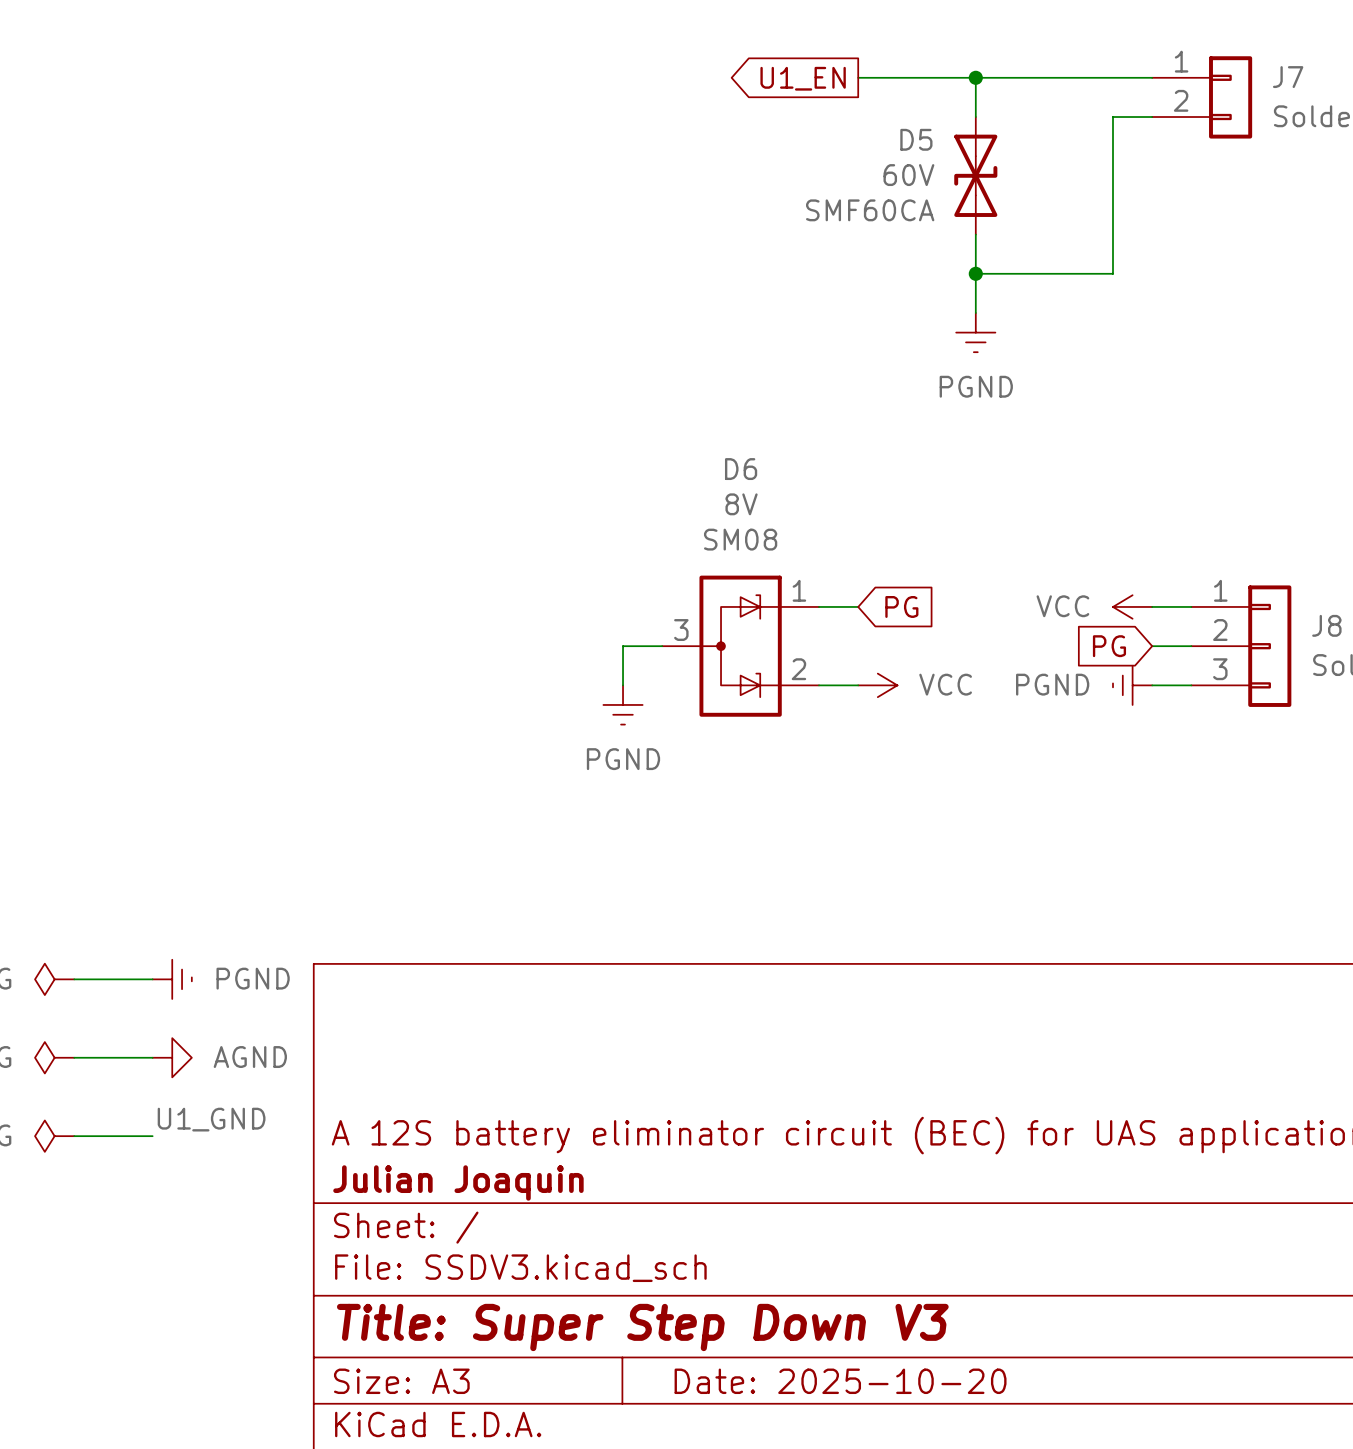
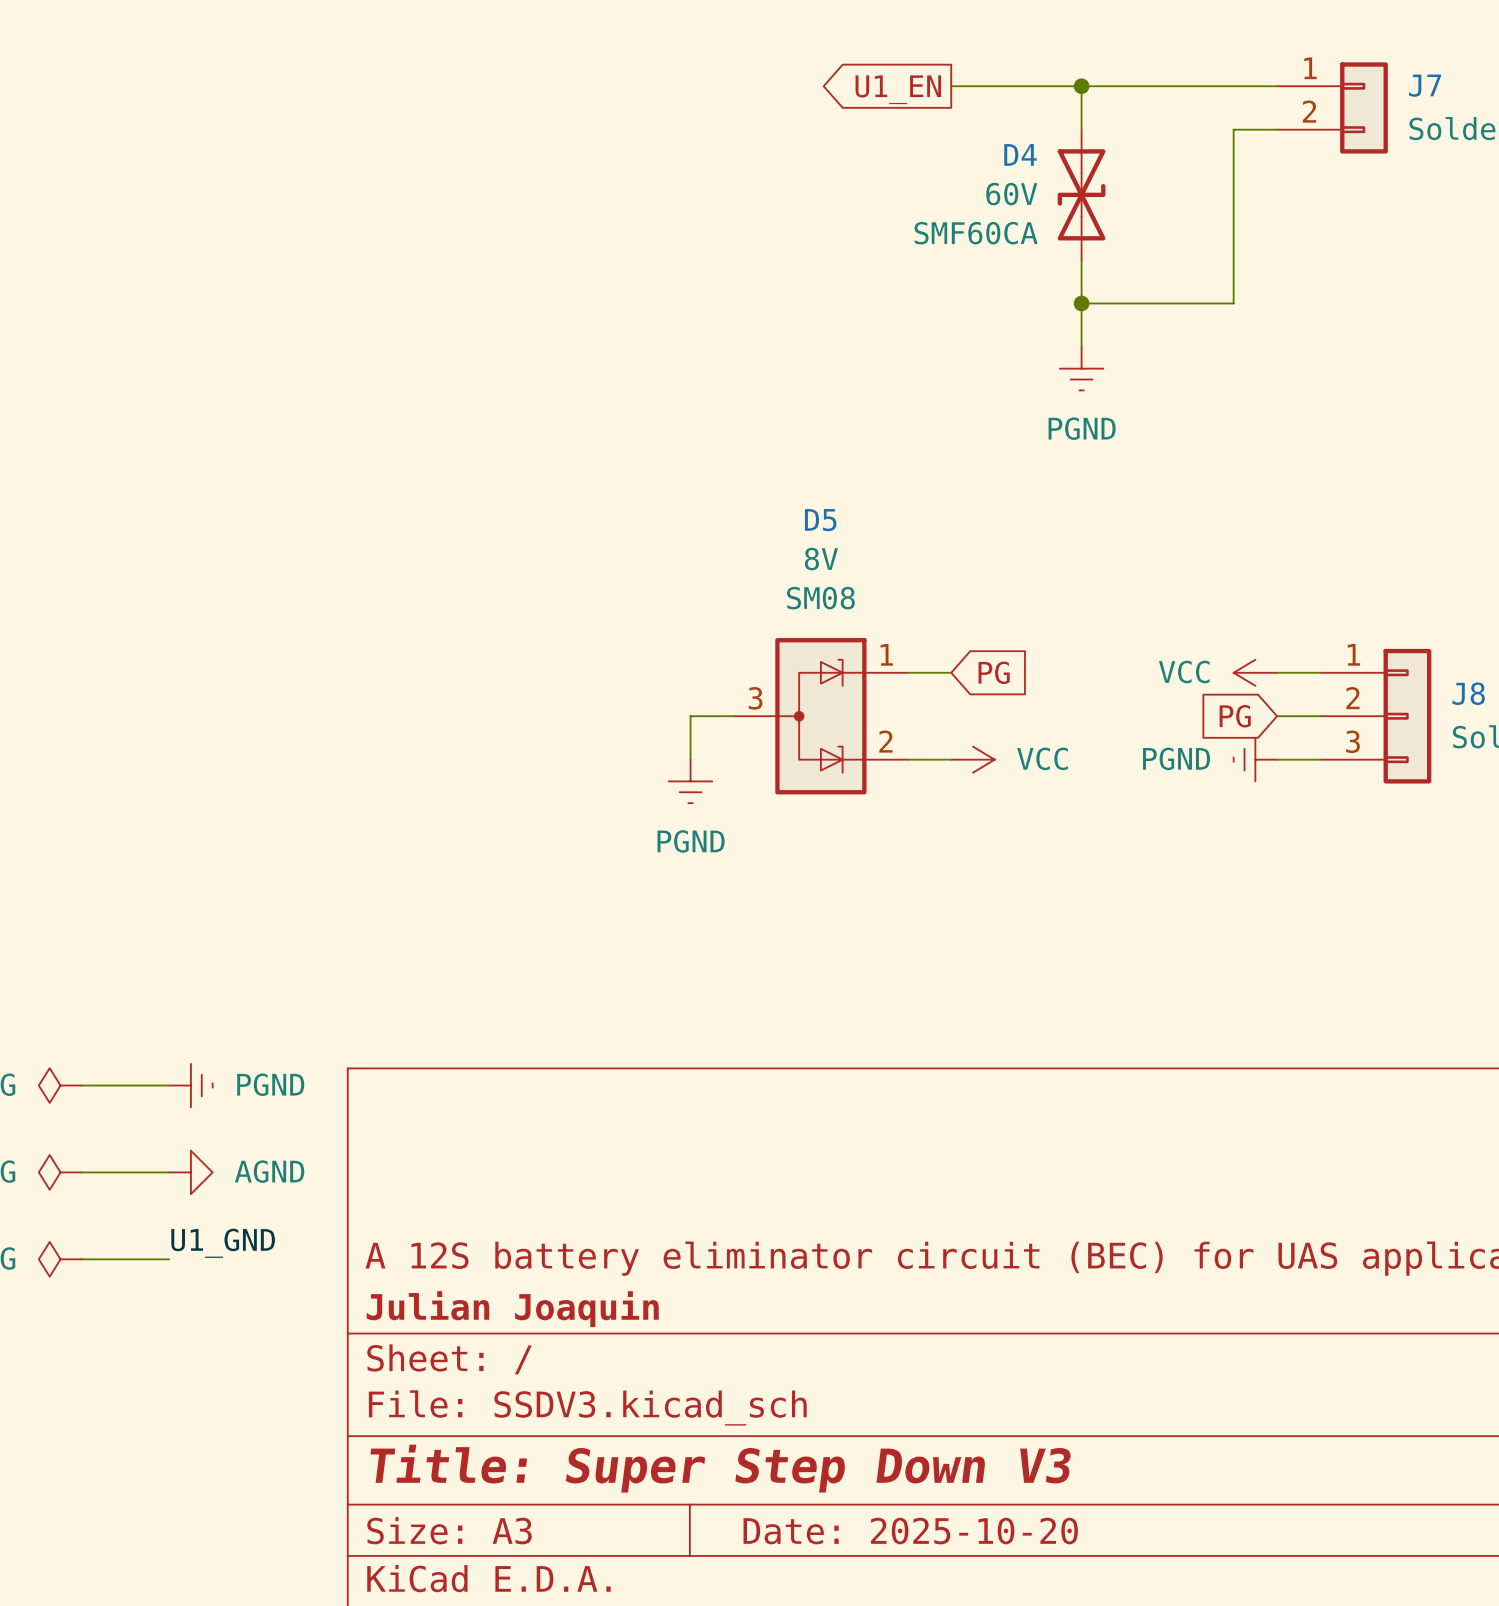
D5 name: D5 (916, 139) -> D4 (1020, 154)
D6 name: D6 (741, 469) -> D5 (820, 520)

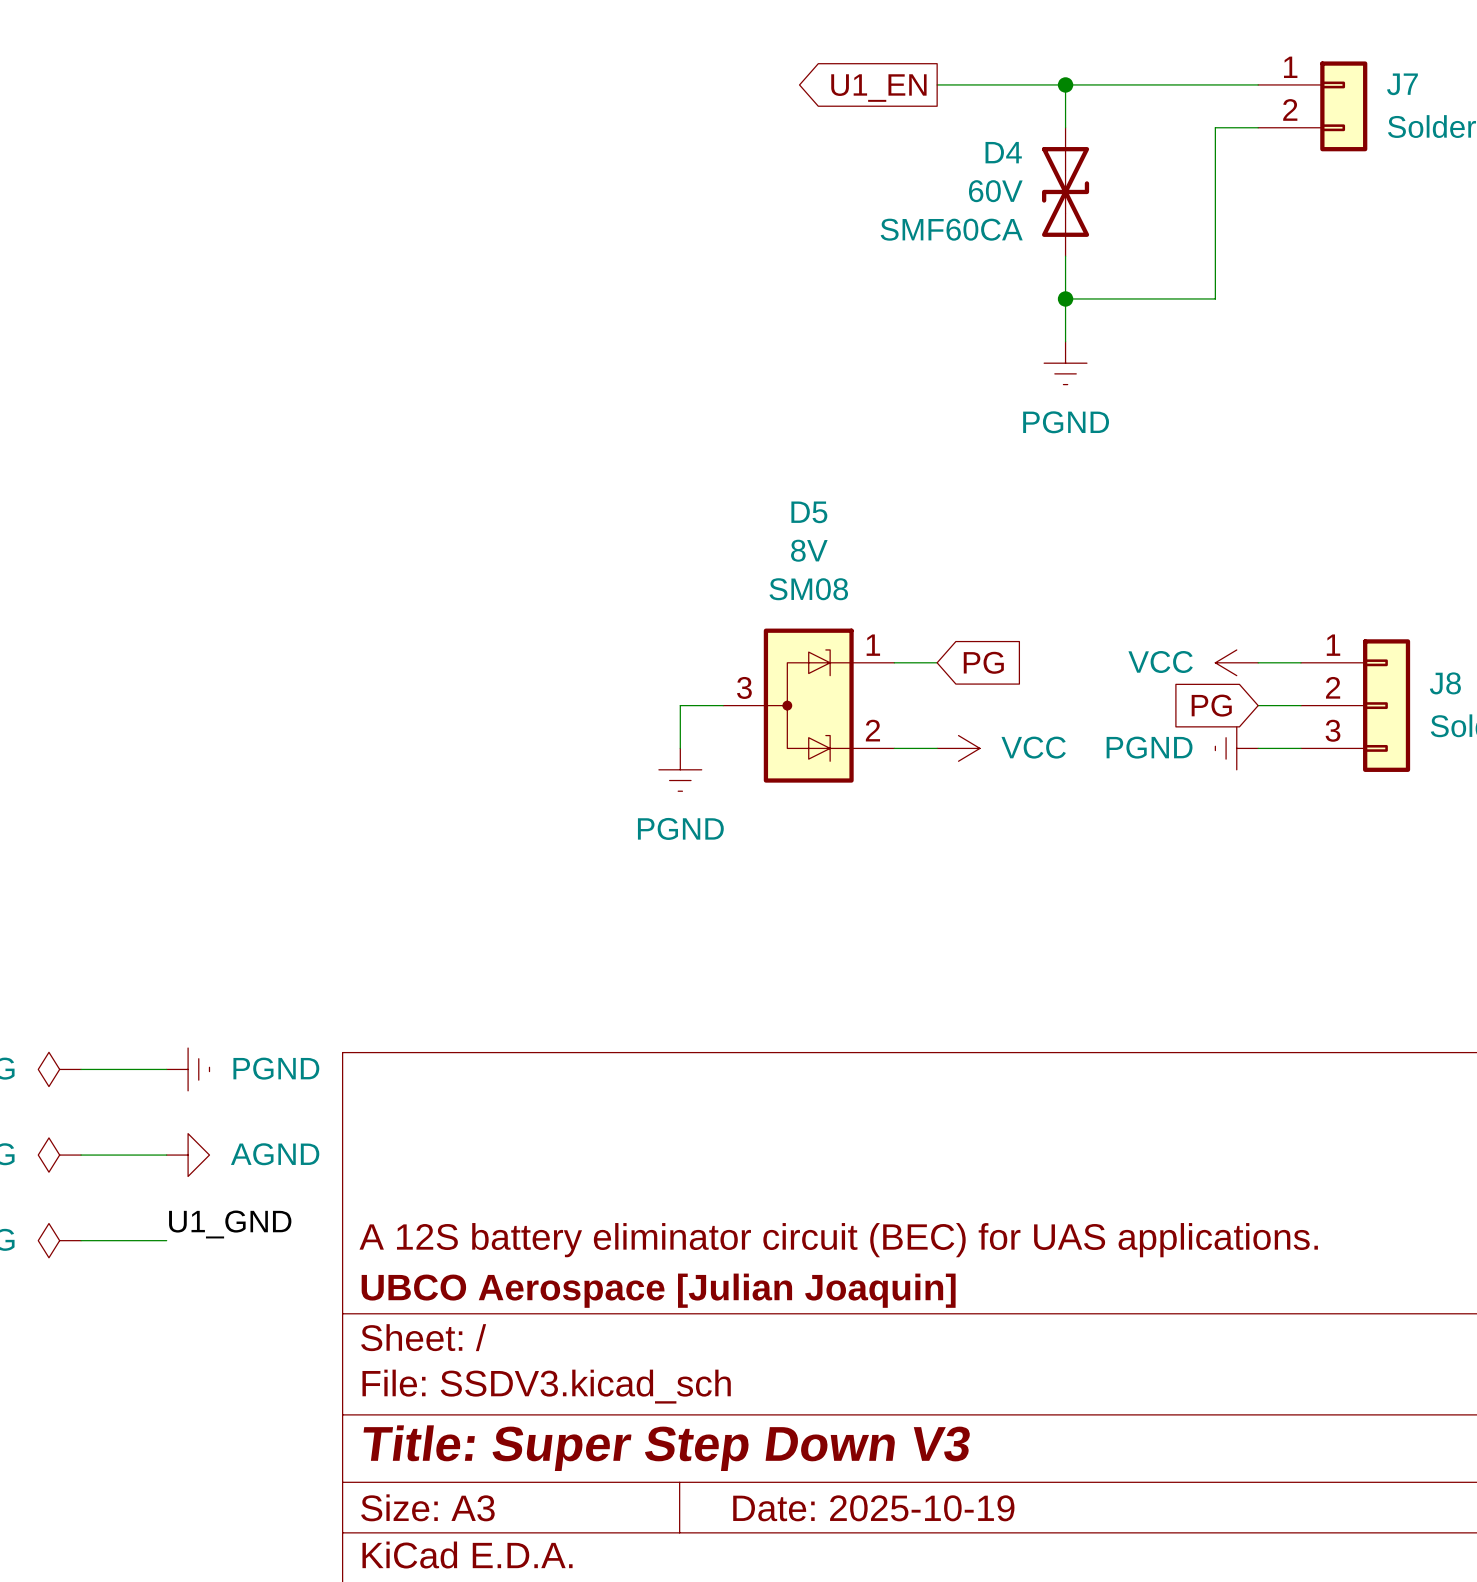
title block: Julian Joaquin (512, 1309) -> UBCO Aerospace [Julian Joaquin] (658, 1290)
title block: Date: 2025-10-20 (910, 1531) -> Date: 2025-10-19 (873, 1508)

